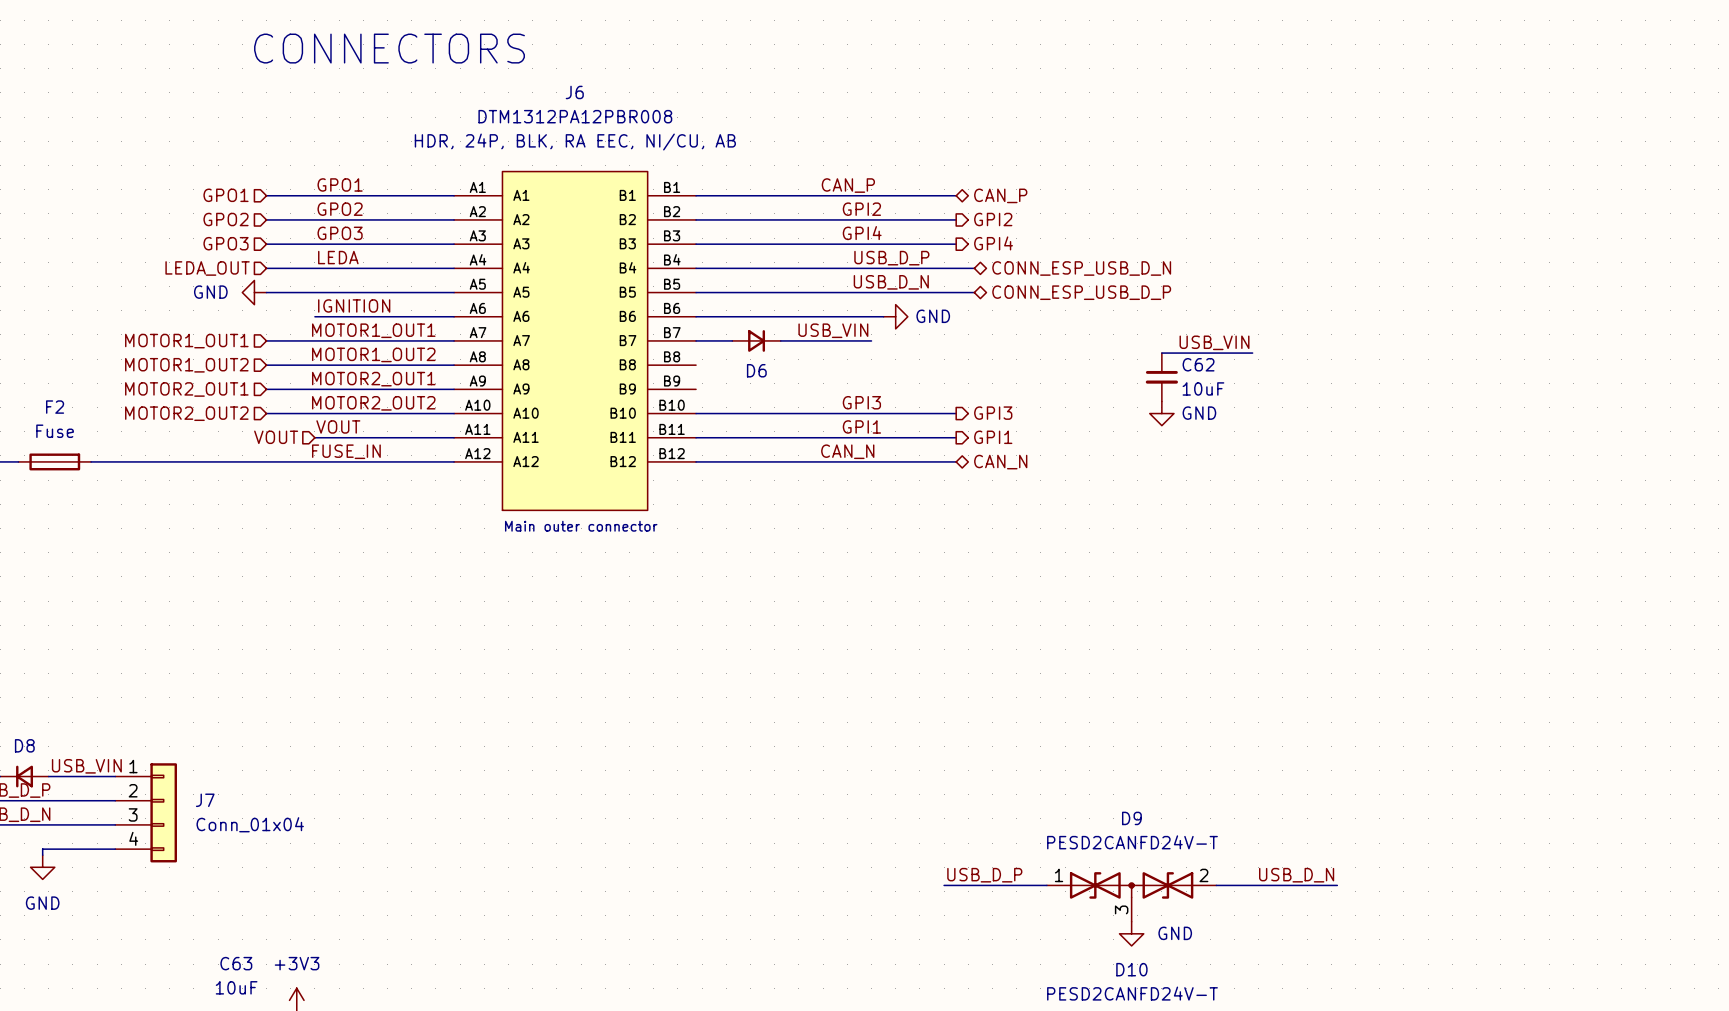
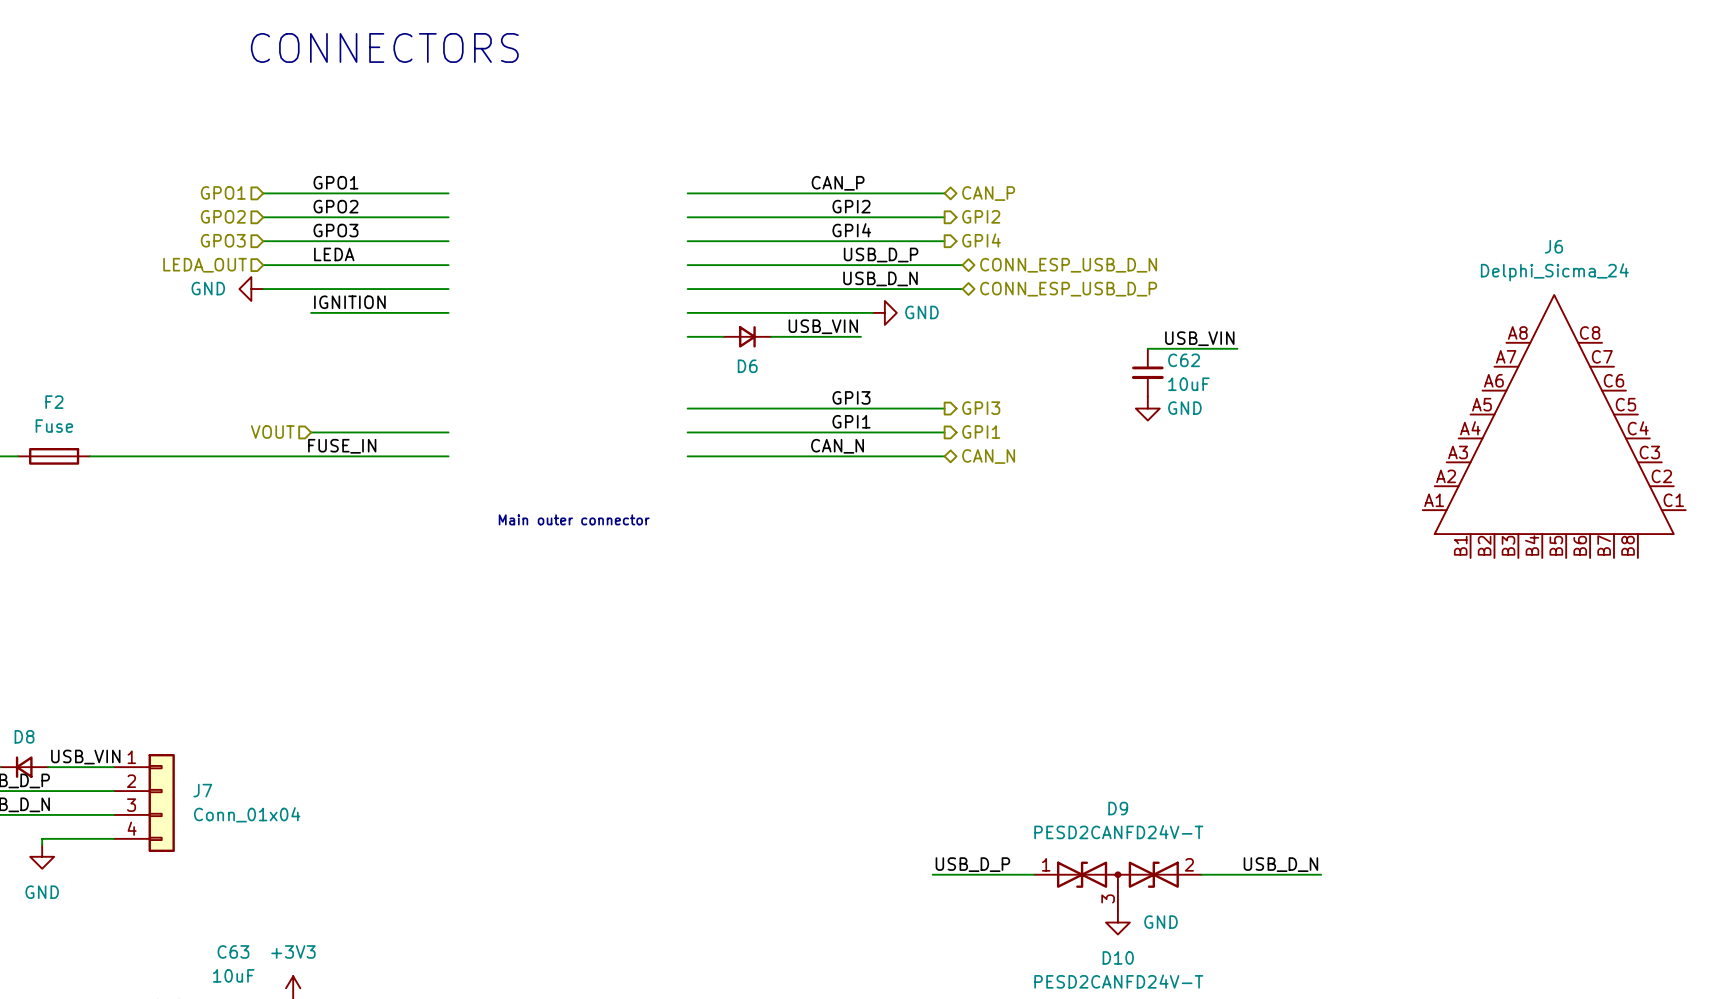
J6 name position: J6 (574, 92) -> J6 (1553, 246)
J6 value: DTM1312PA12PBR008 (575, 116) -> Delphi_Sicma_24 (1554, 272)
J6 text: HDR, 24P, BLK, RA EEC, NI/CU, AB (575, 142) -> none
J6 symbol: [454, 170, 697, 512] -> [1422, 295, 1686, 558]
label: MOTOR1_OUT1 (373, 330) -> none
wire: (266, 340) (454, 340) -> none
hierarchical label: MOTOR1_OUT1 (186, 341) -> none
label: MOTOR1_OUT2 (373, 354) -> none
hierarchical label: MOTOR1_OUT2 (186, 365) -> none
wire: (266, 365) (454, 365) -> none
label: MOTOR2_OUT1 (373, 379) -> none
hierarchical label: MOTOR2_OUT1 (186, 389) -> none
wire: (266, 389) (454, 389) -> none
label: MOTOR2_OUT2 (373, 403) -> none
hierarchical label: MOTOR2_OUT2 (186, 413) -> none
wire: (266, 413) (454, 413) -> none
label: VOUT (338, 426) -> none

